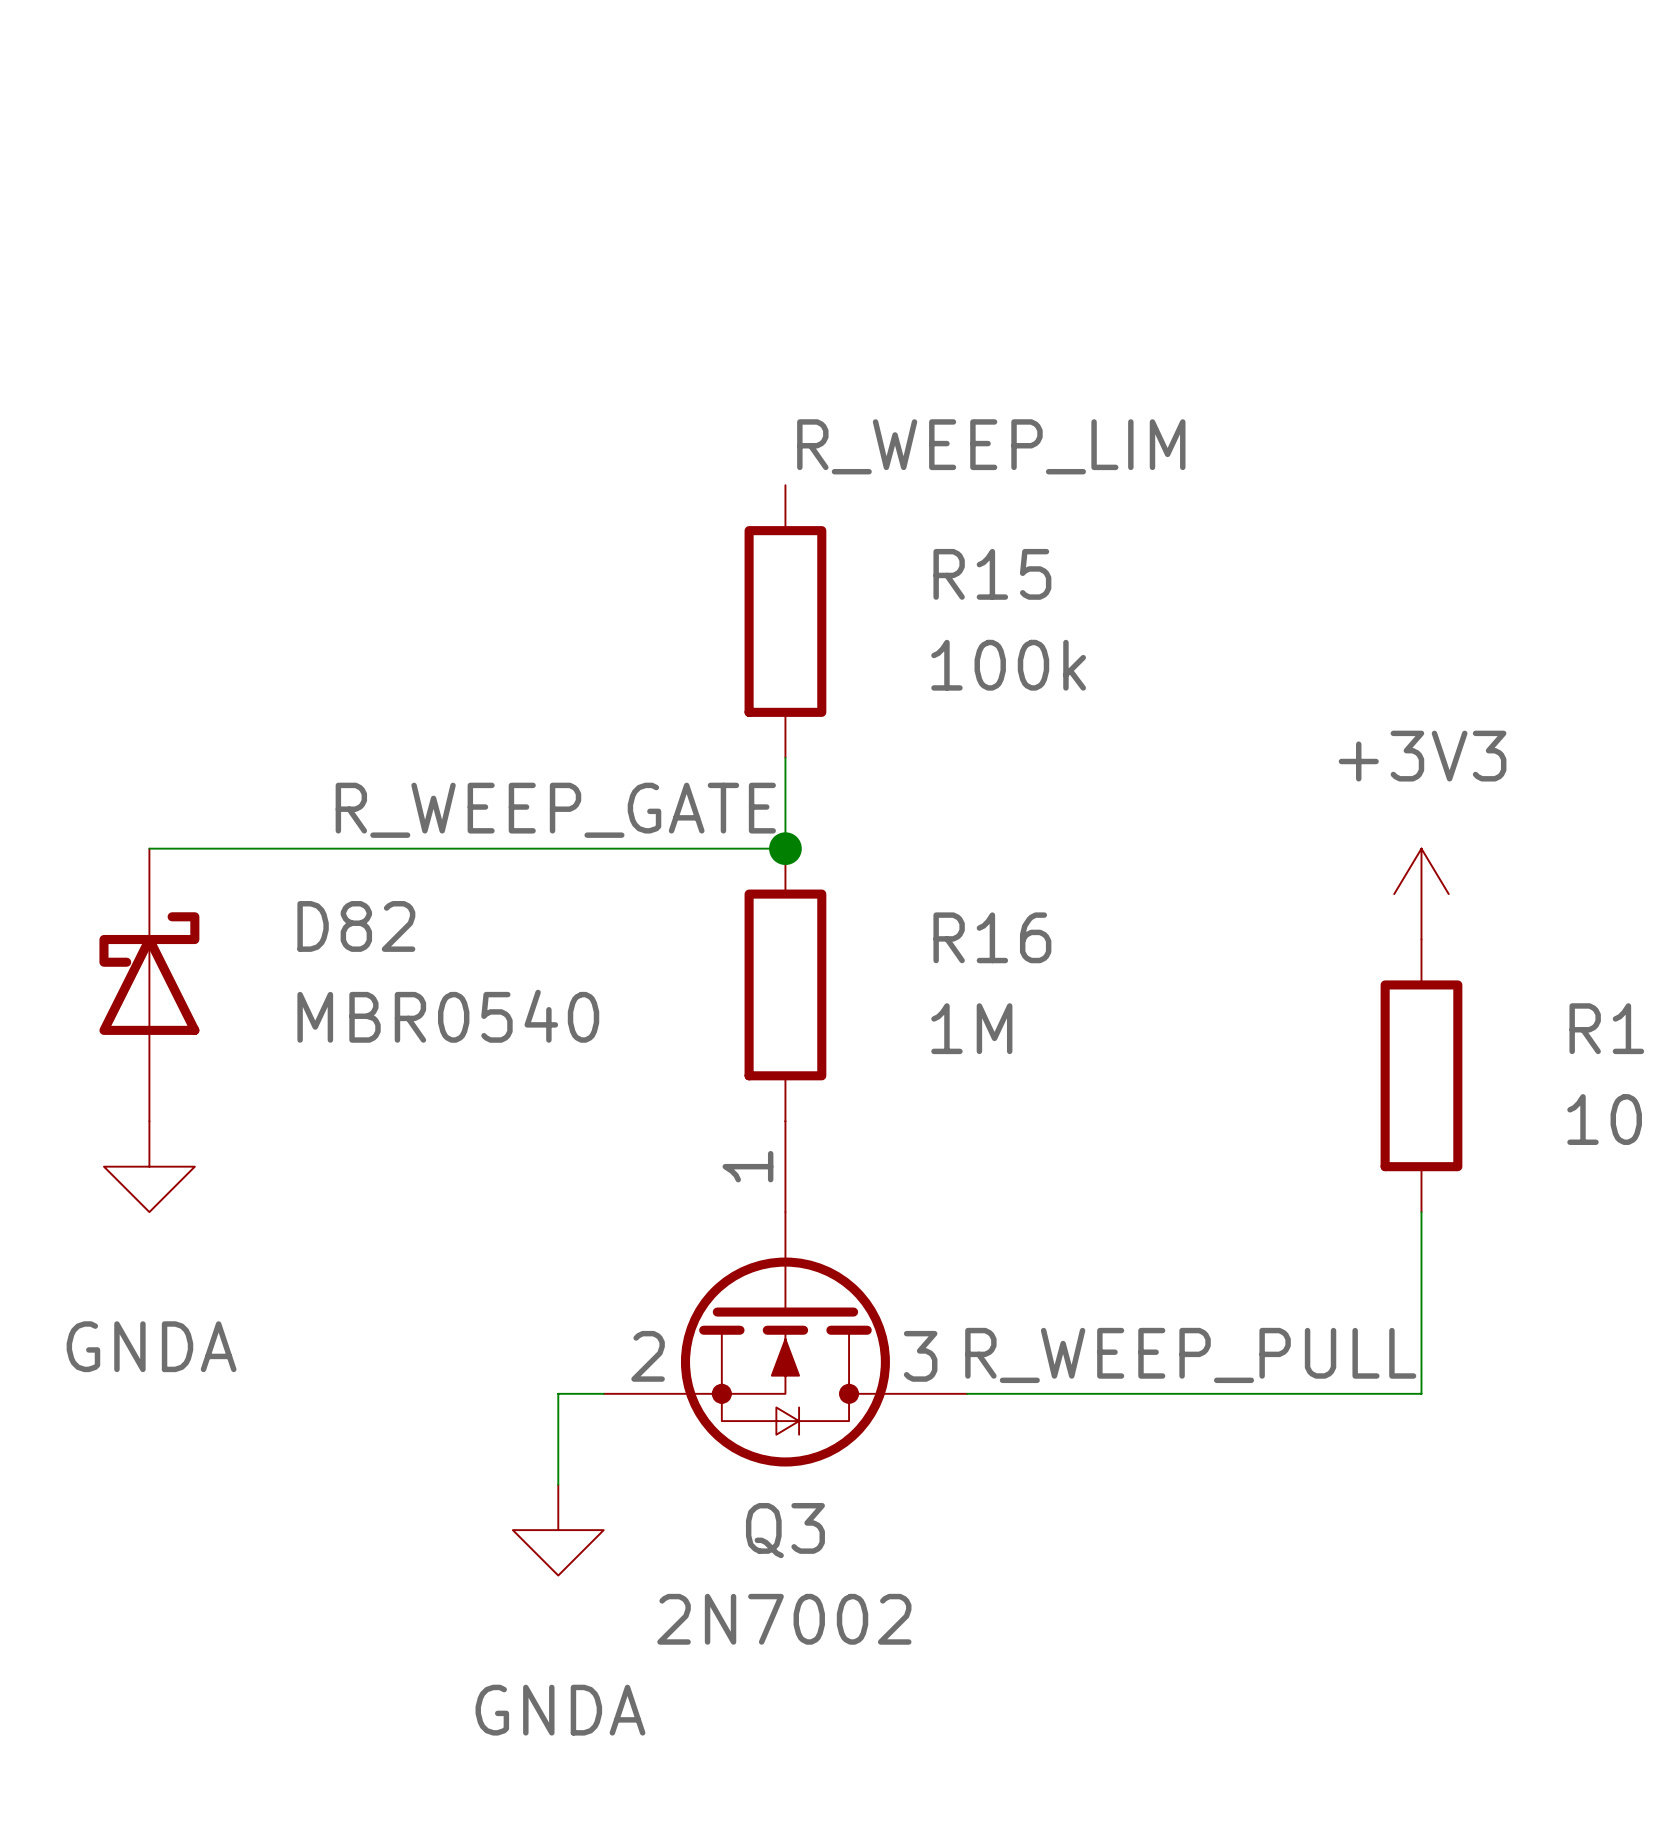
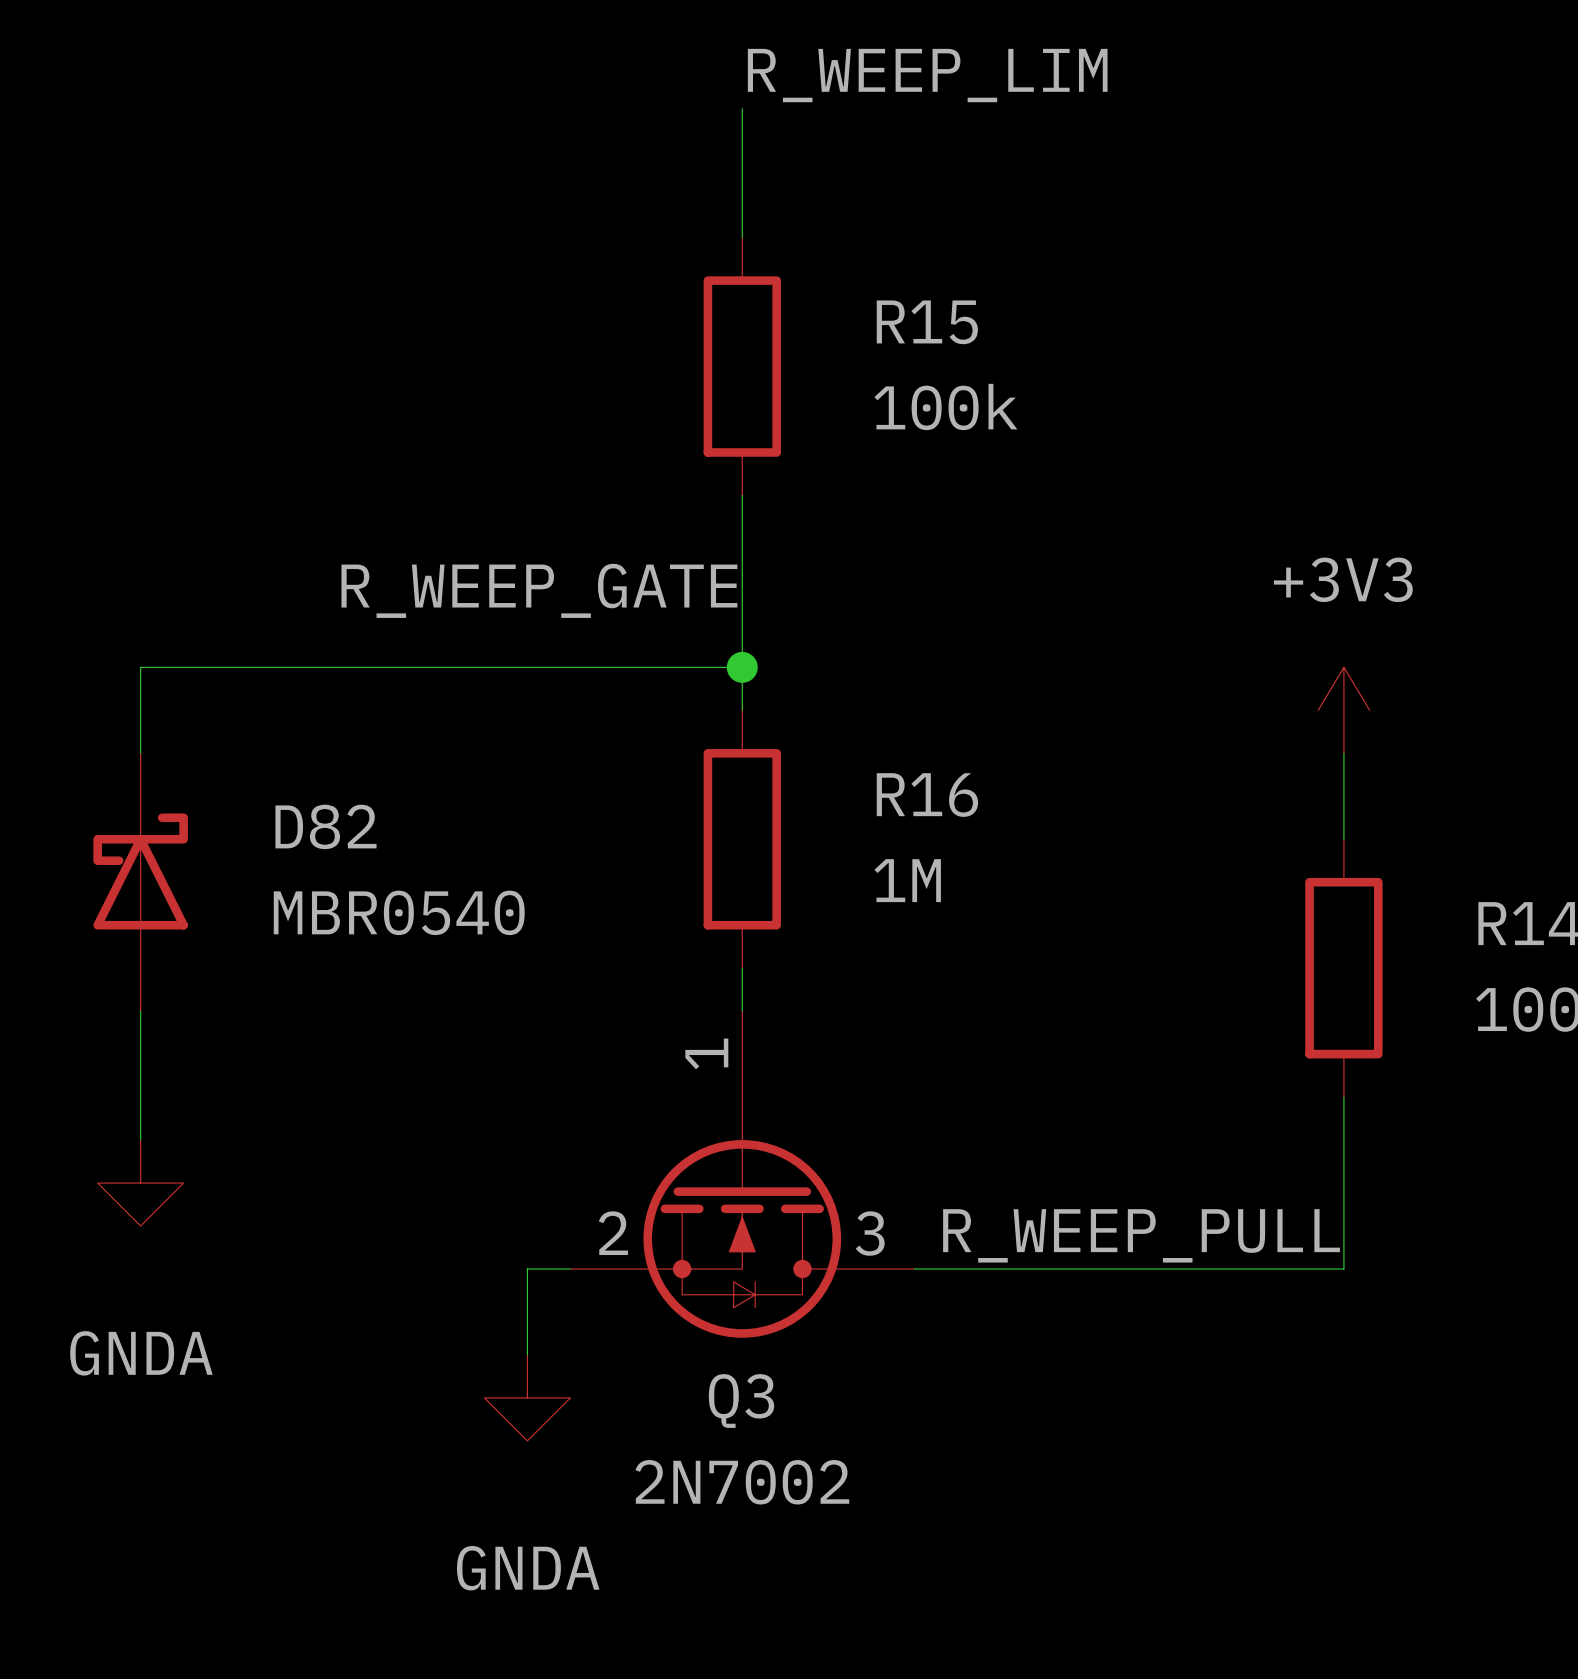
wire: none -> (742, 108) (742, 237)
label position: R_WEEP_LIM (991, 446) -> R_WEEP_LIM (927, 75)
R15 position: (785, 621) -> (742, 366)
wire: (785, 803) (785, 848) (149, 848) -> (742, 495) (742, 667) (140, 667) (140, 753)
label position: R_WEEP_GATE (555, 810) -> R_WEEP_GATE (539, 590)
junction position: (785, 848) -> (742, 667)
power symbol position: +3V3 (1421, 894) -> +3V3 (1343, 710)
R16 position: (785, 984) -> (742, 839)
wire: none -> (140, 1011) (140, 1140)
power symbol position: GNDA (149, 1166) -> GNDA (140, 1183)

